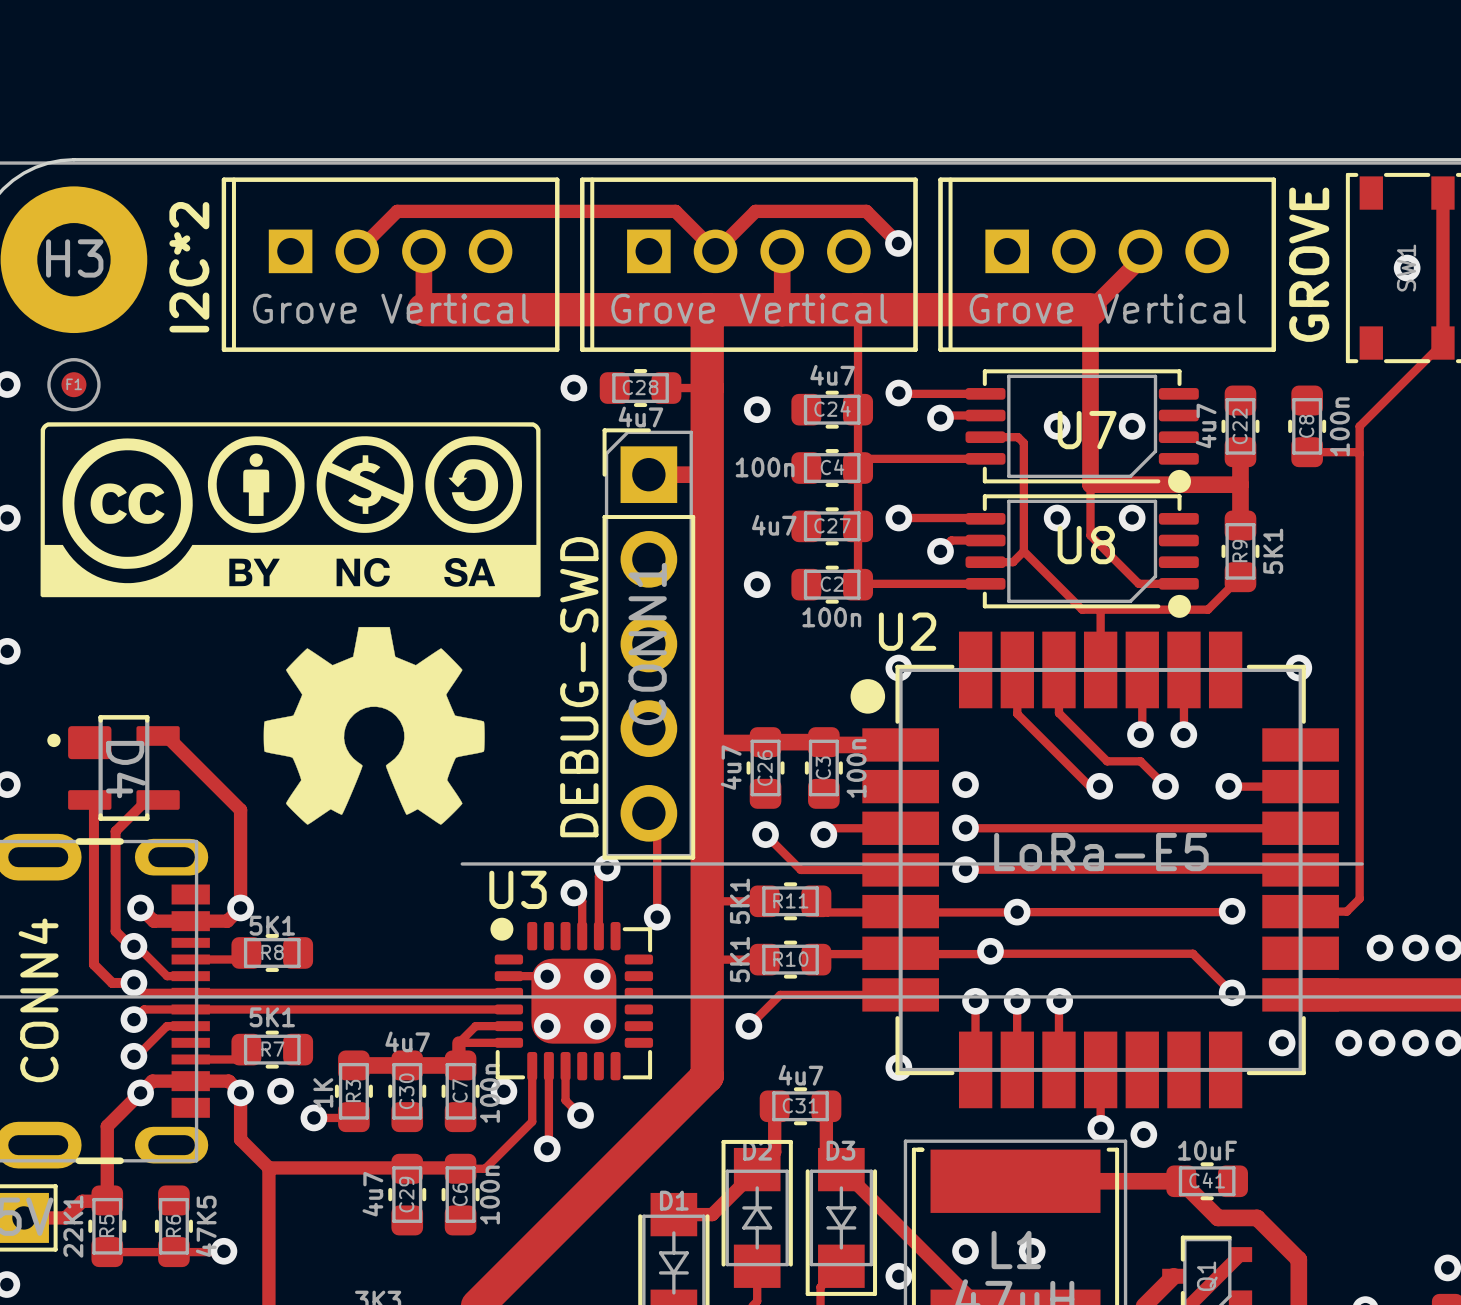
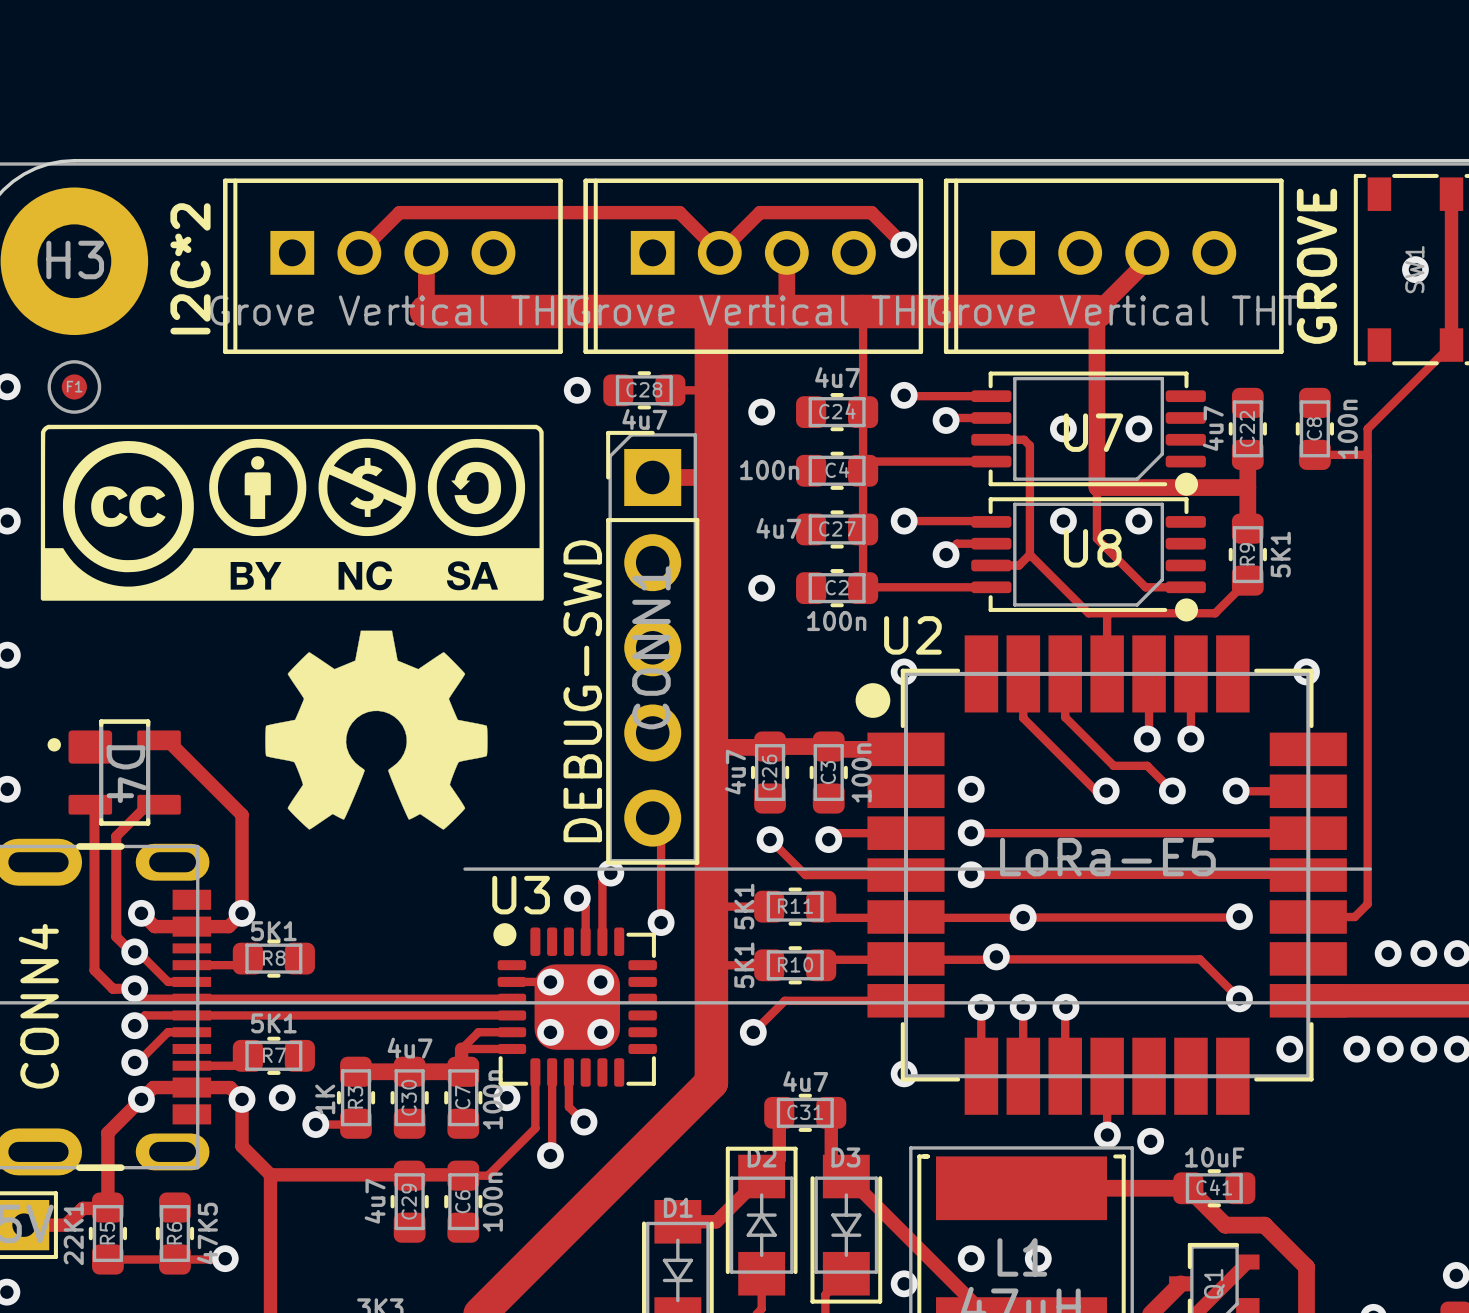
part value: Grove Vertical (391, 308) -> Grove Vertical THT (394, 310)
part value: Grove Vertical (749, 308) -> Grove Vertical THT (754, 310)
part value: Grove Vertical (1107, 308) -> Grove Vertical THT (1114, 310)

